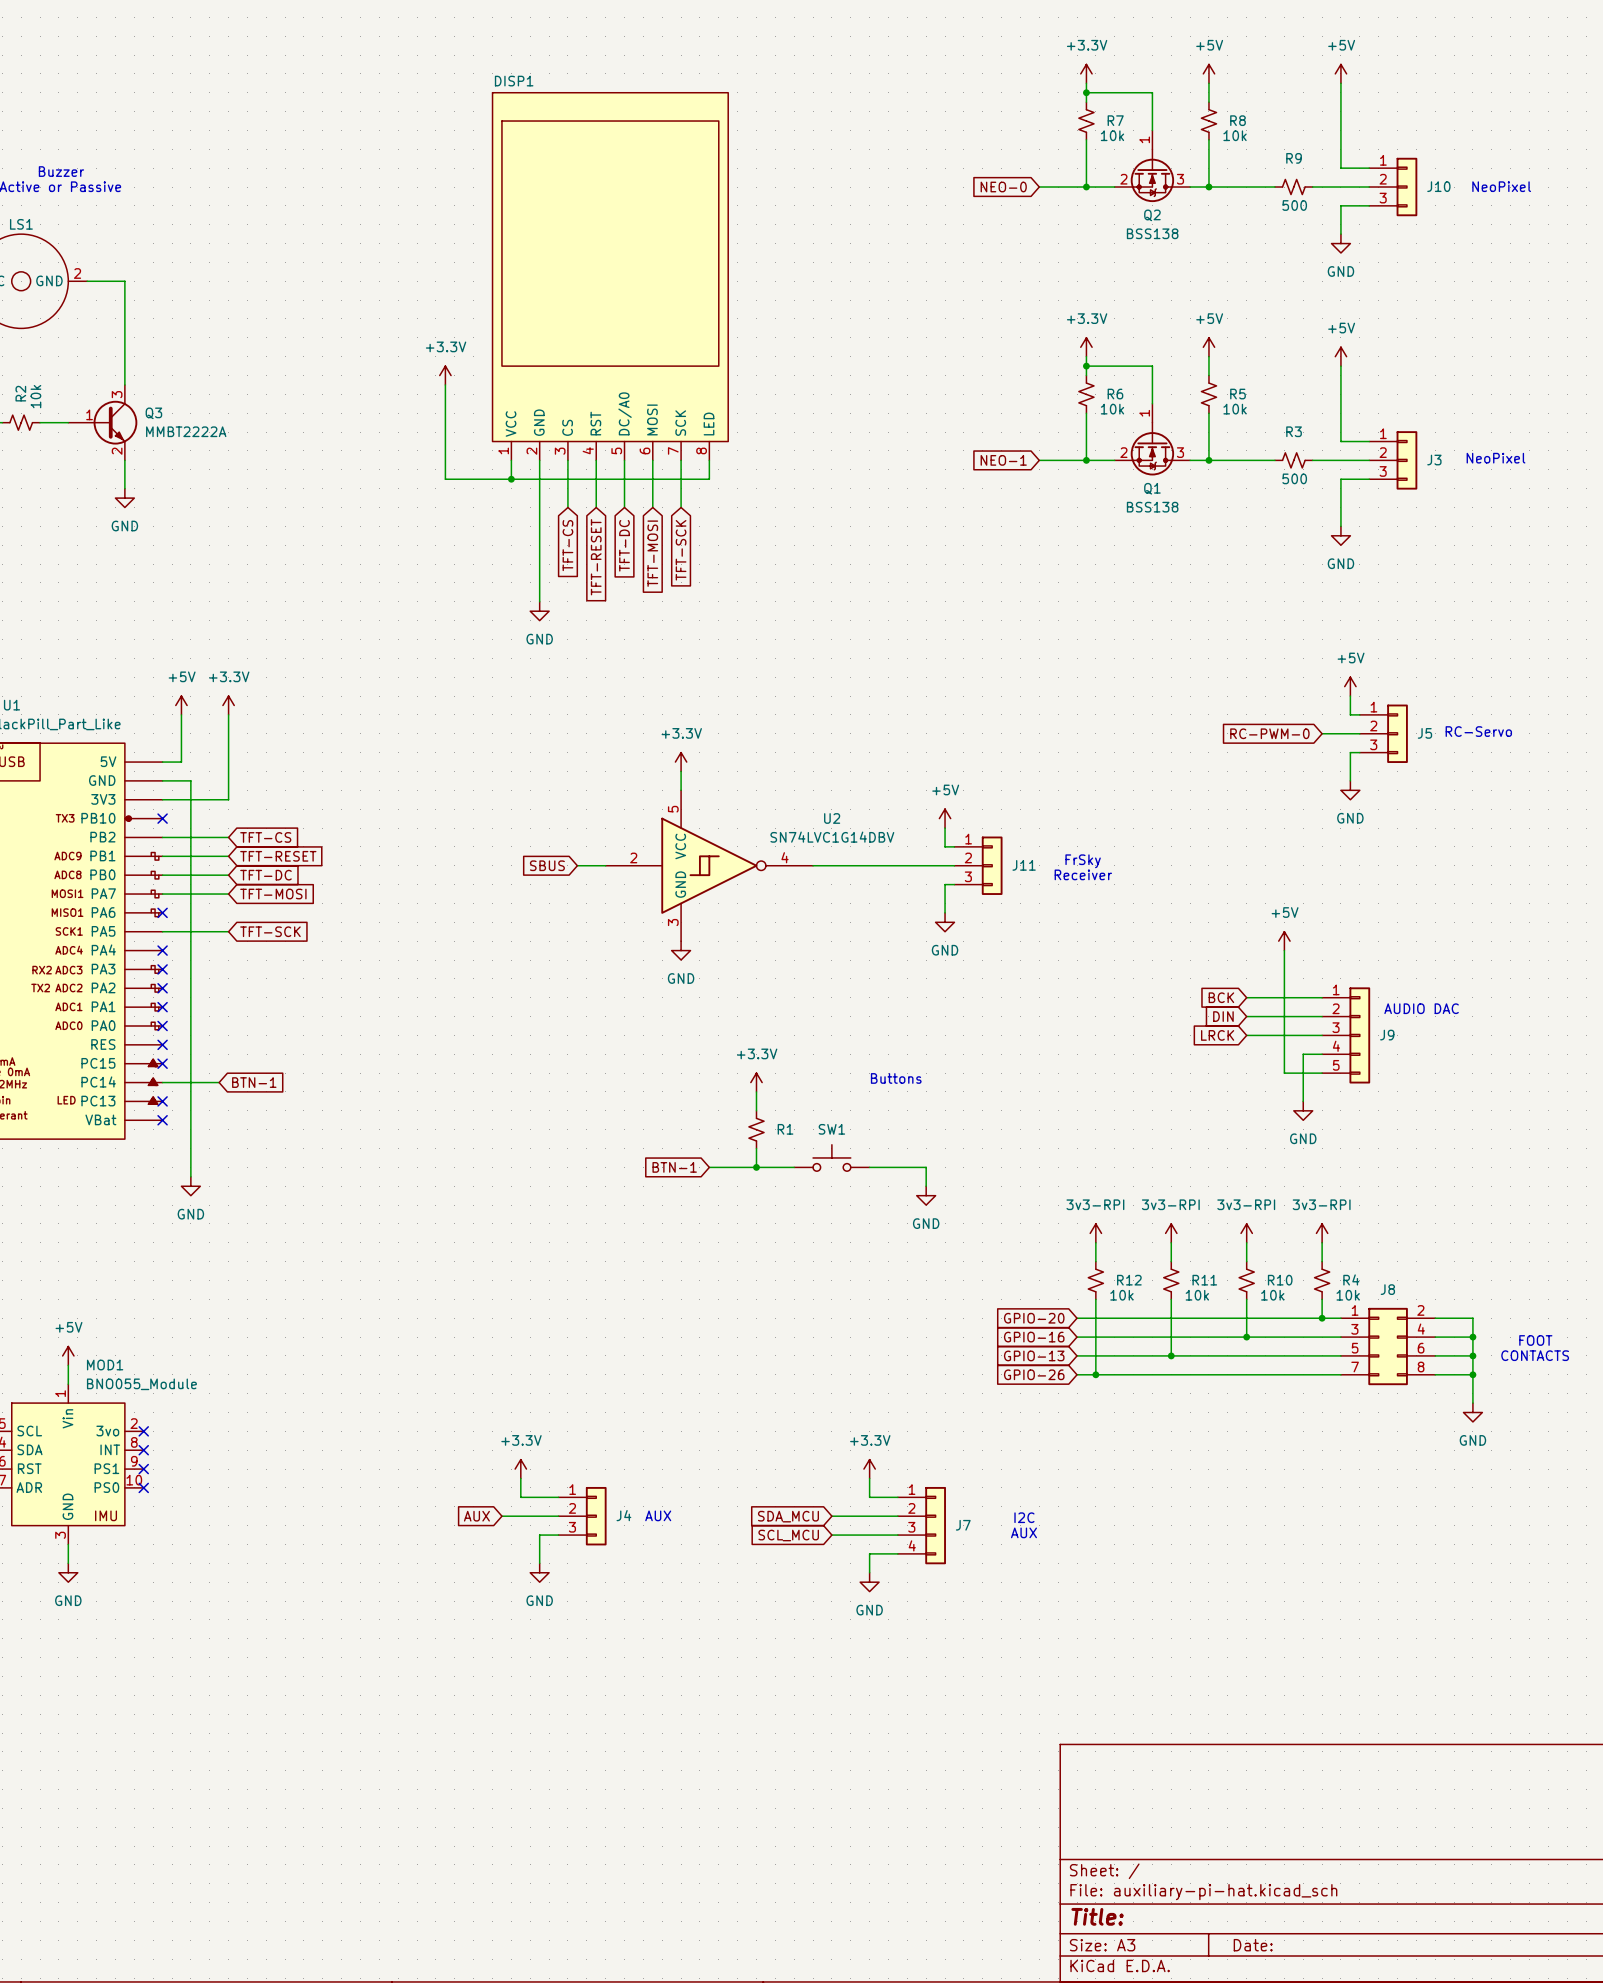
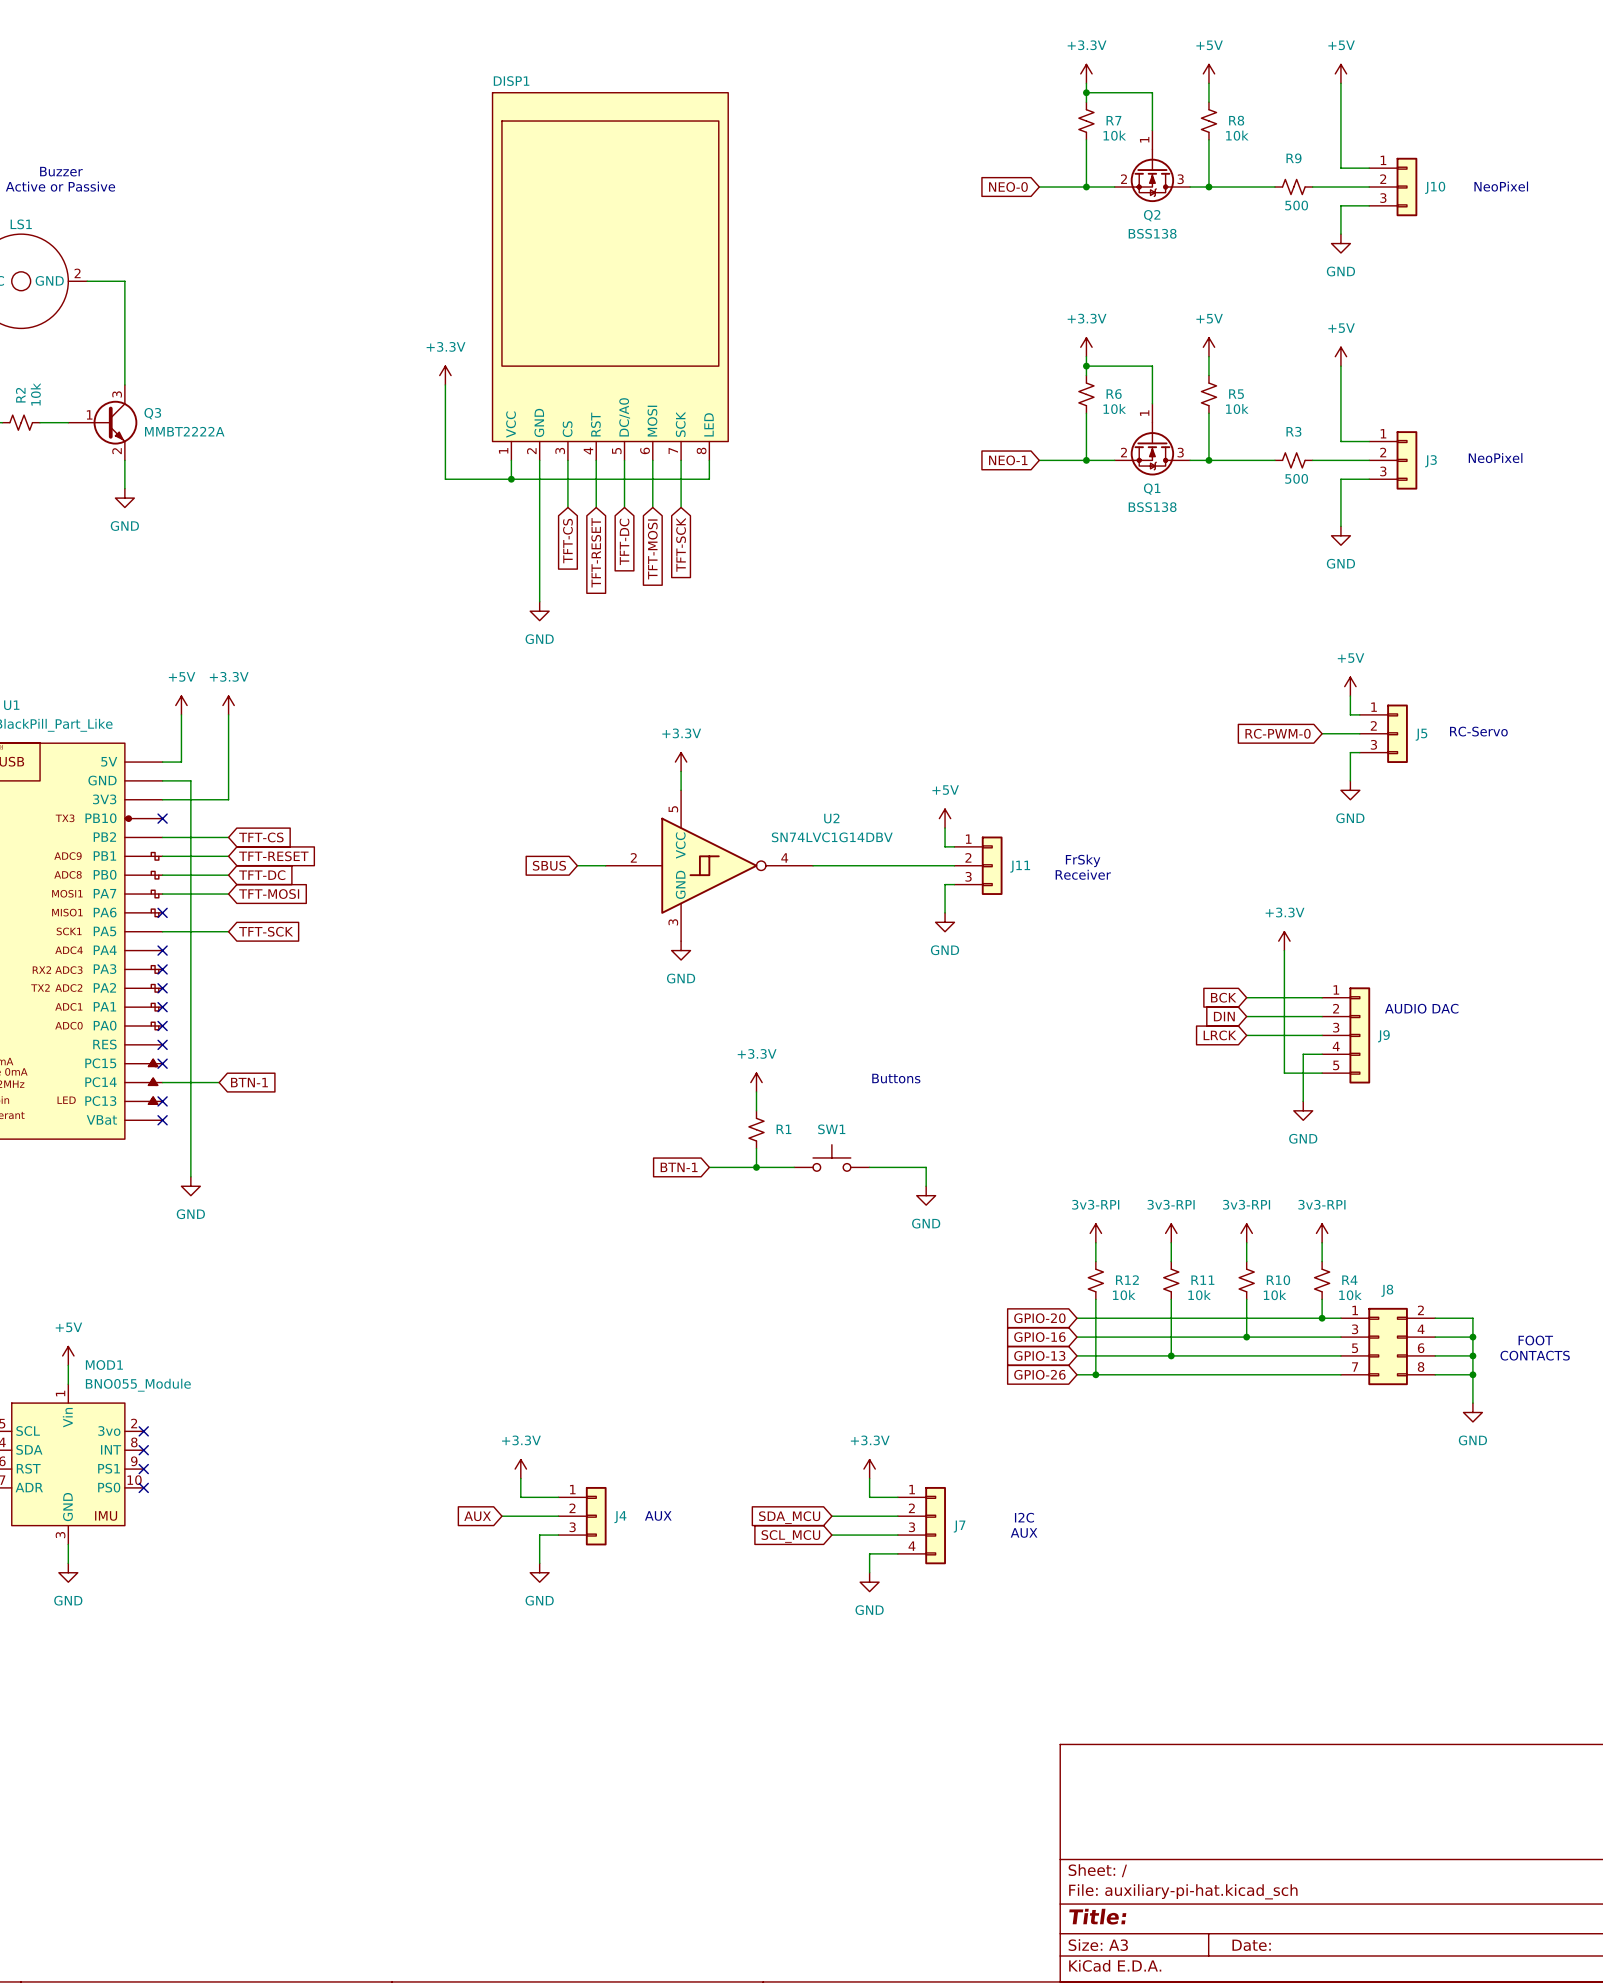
power symbol: +5V (1284, 941) -> +3.3V (1284, 941)

